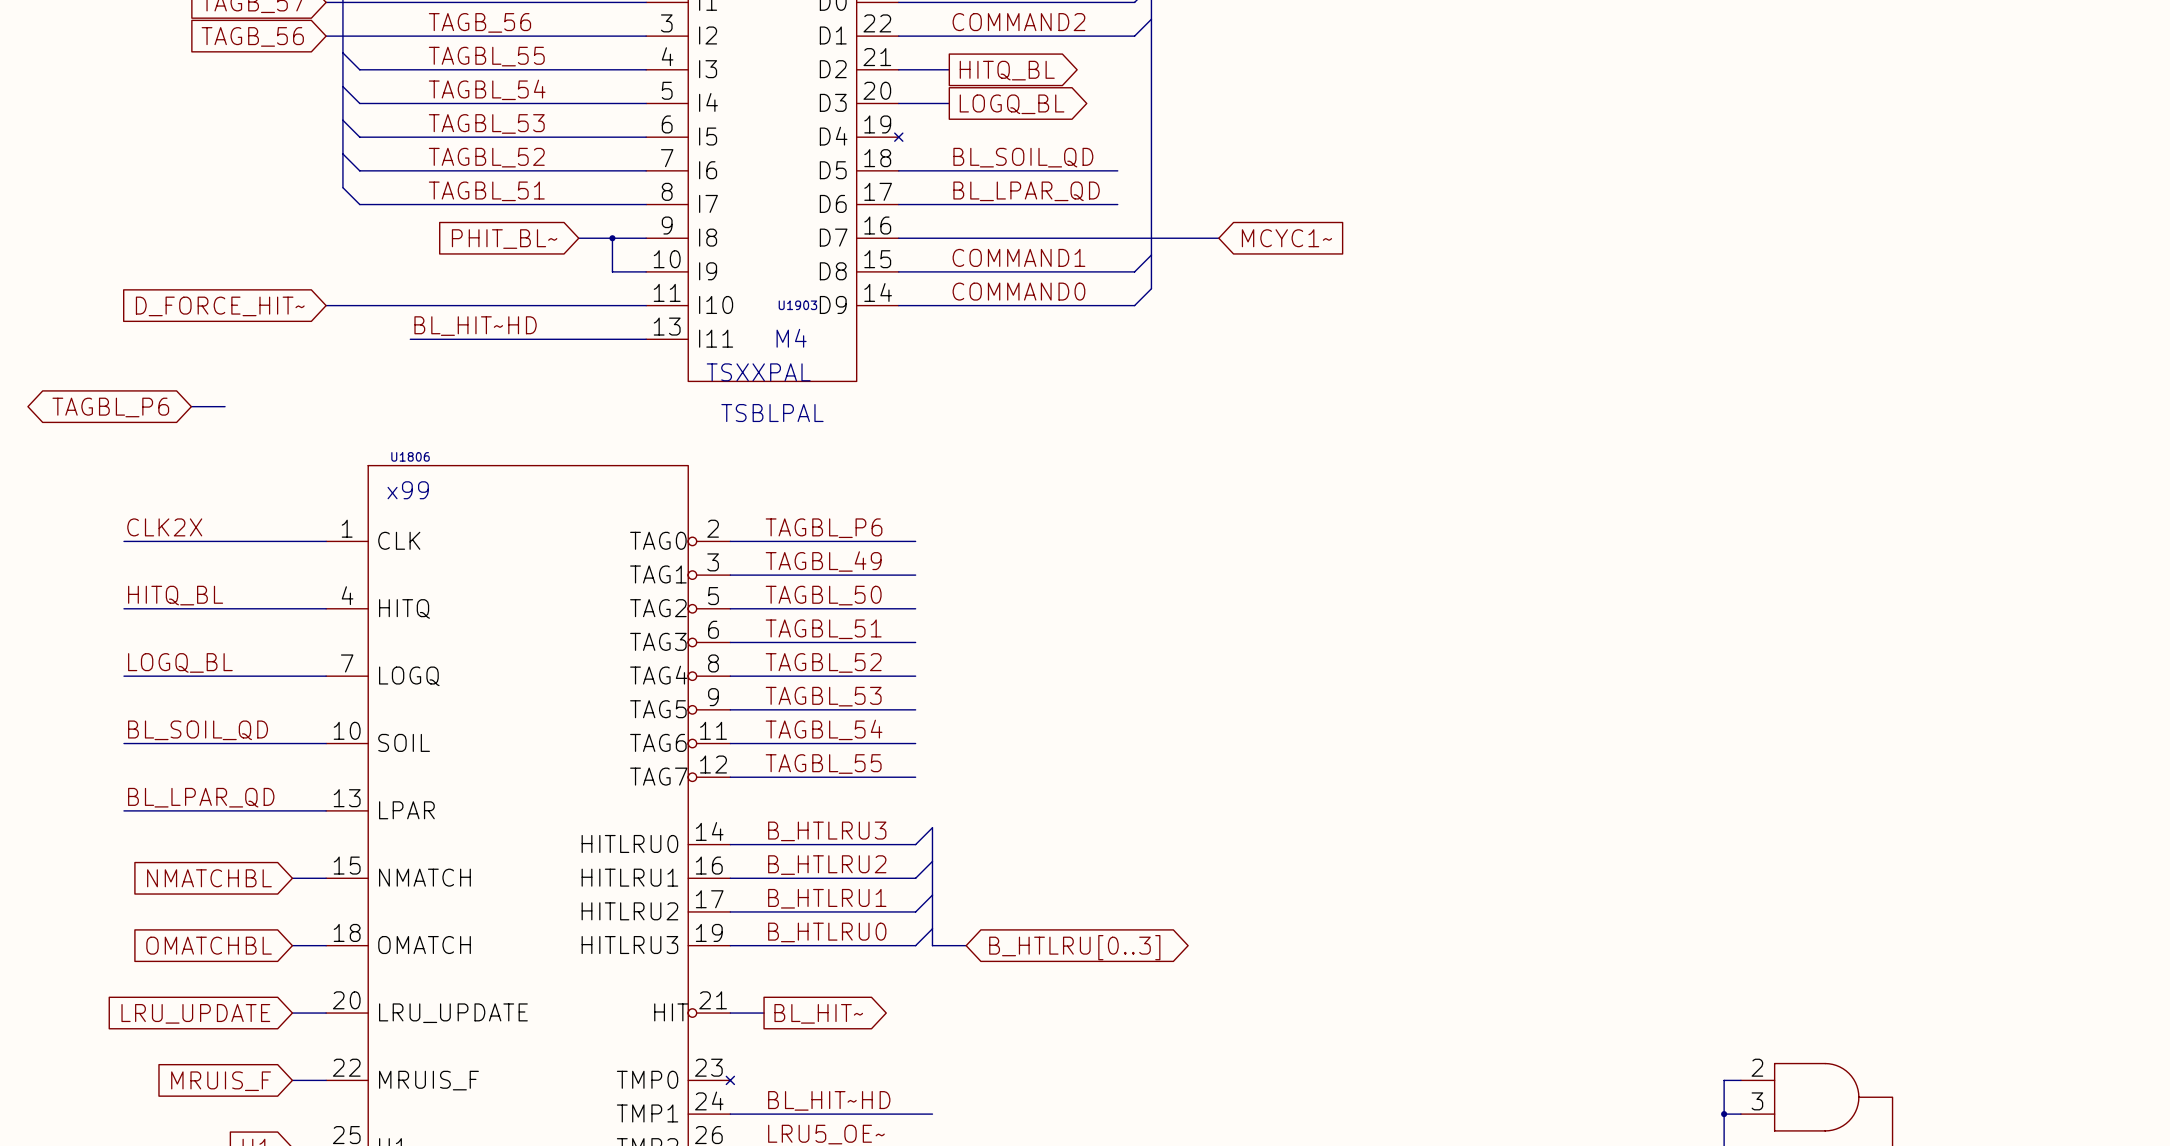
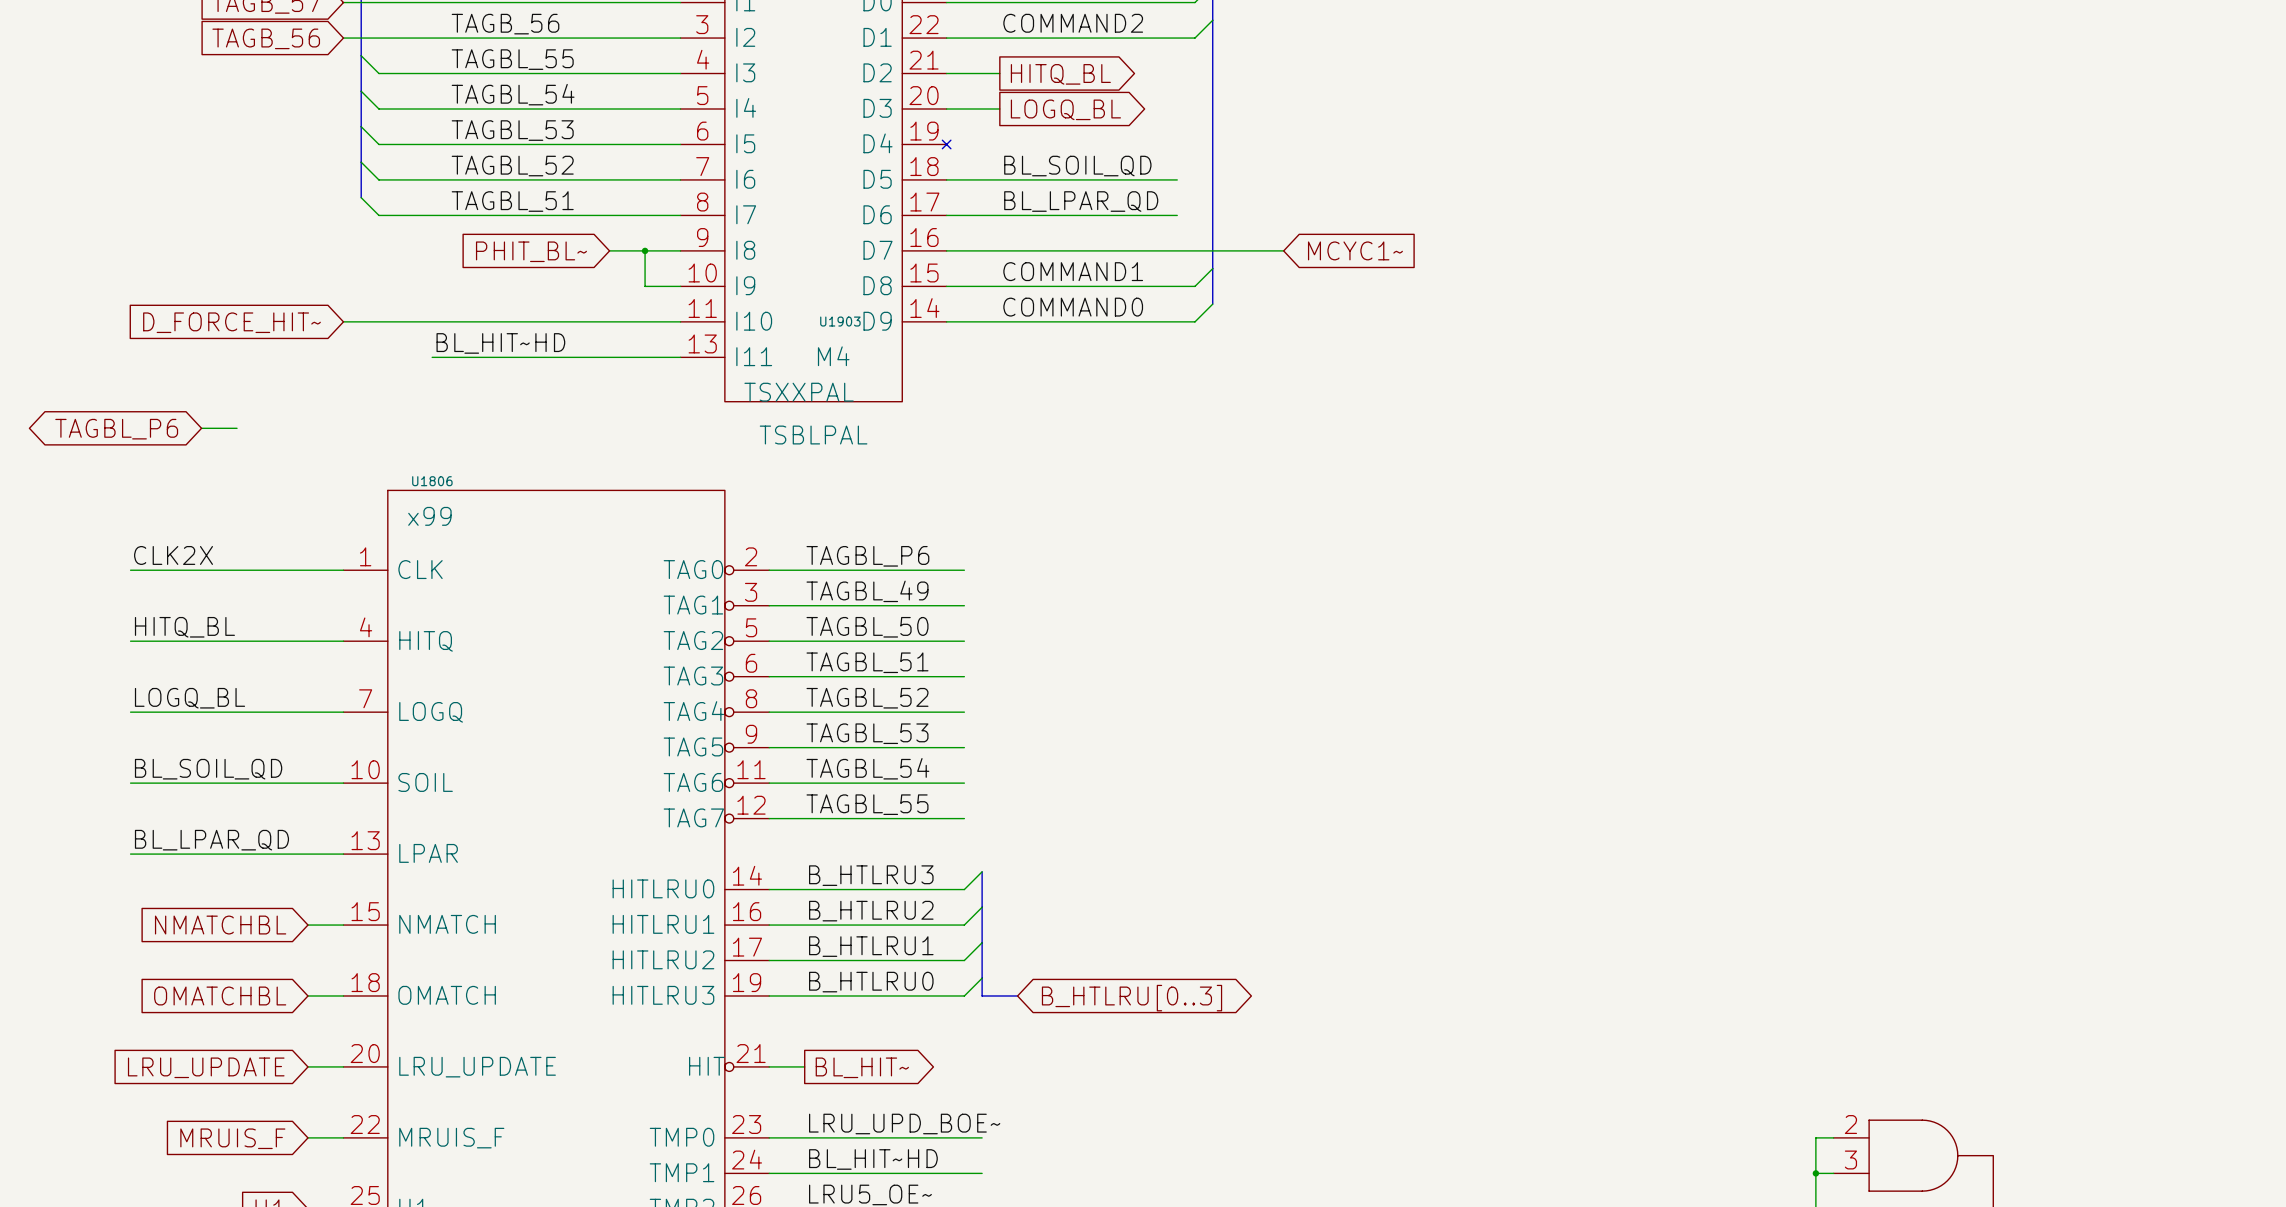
label: none -> LRU_UPD_BOE~ (904, 1123)
wire: none -> (769, 1137) (982, 1137)
no-connect mark: (730, 1080) -> none

